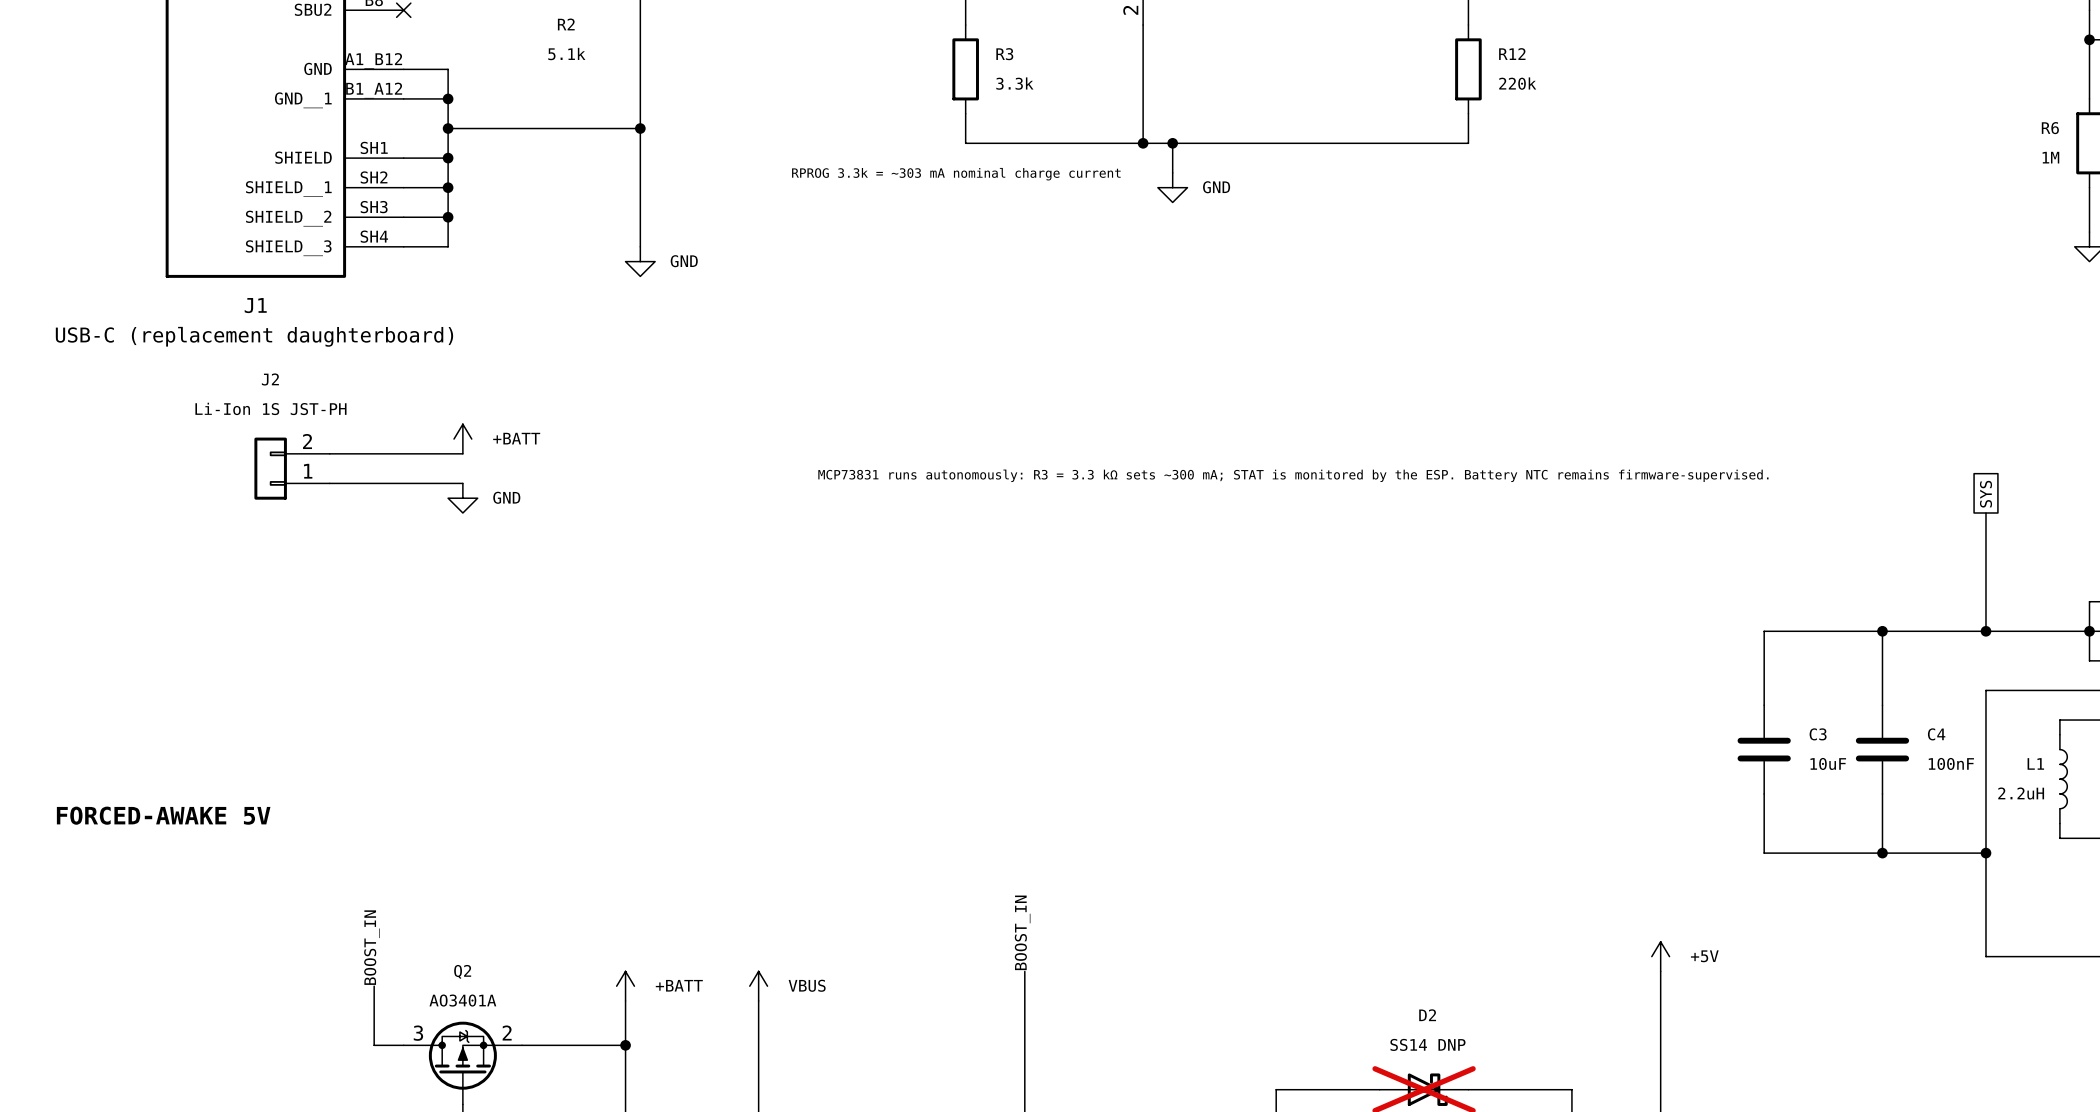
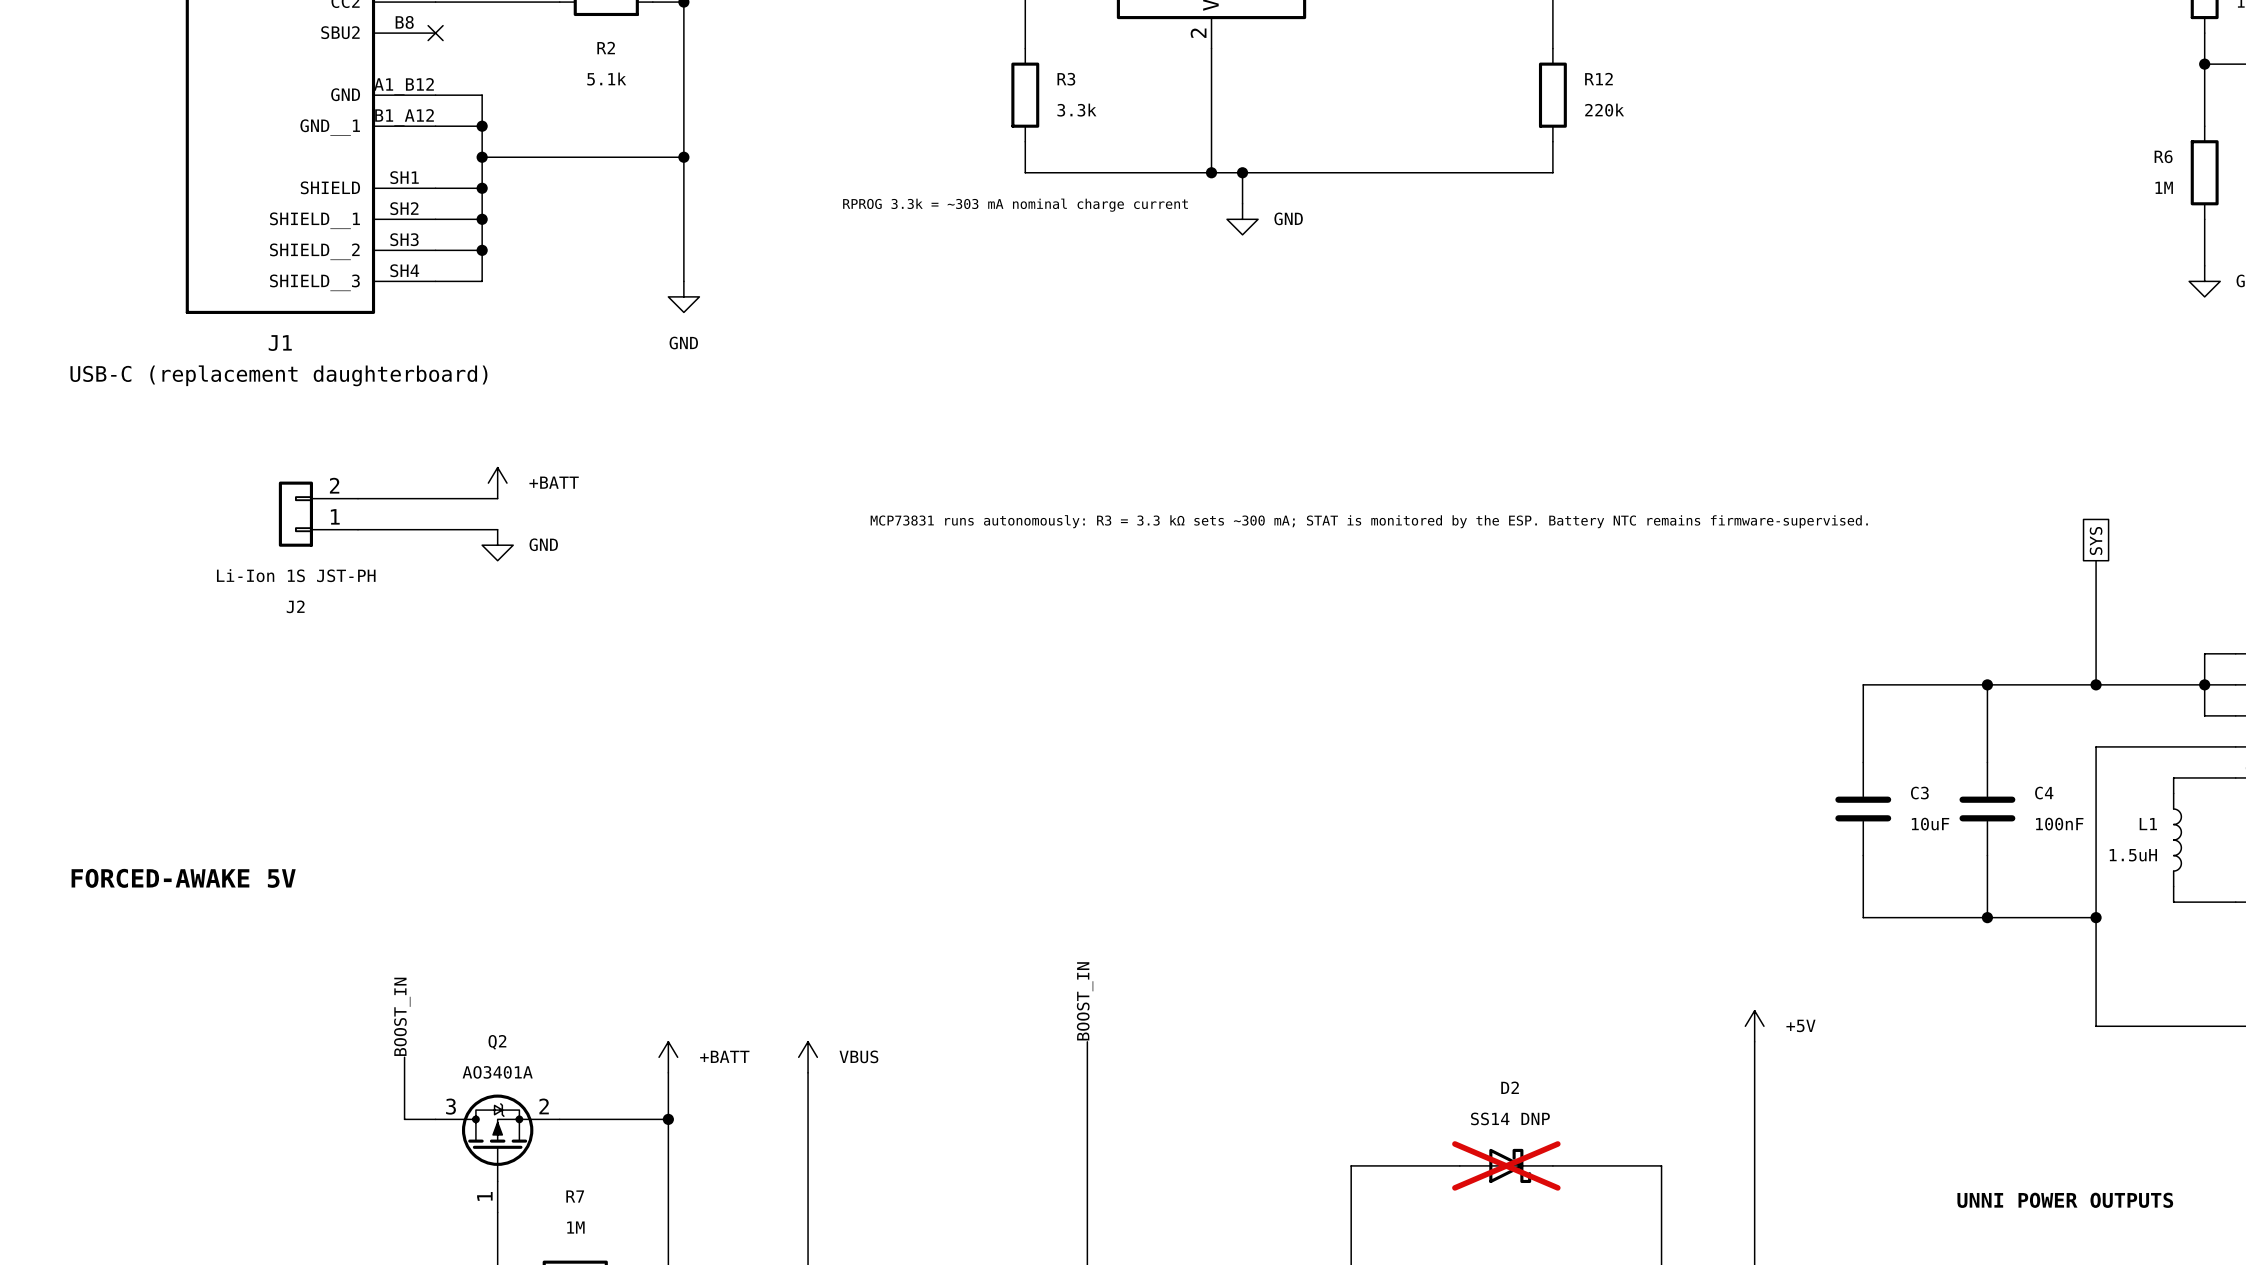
power symbol text position: GND (684, 261) -> GND (683, 343)
J2 name position: J2 (270, 379) -> J2 (295, 606)
J2 value position: Li-Ion 1S JST-PH (270, 408) -> Li-Ion 1S JST-PH (296, 575)
L1 value: 2.2uH (2021, 793) -> 1.5uH (2133, 855)

